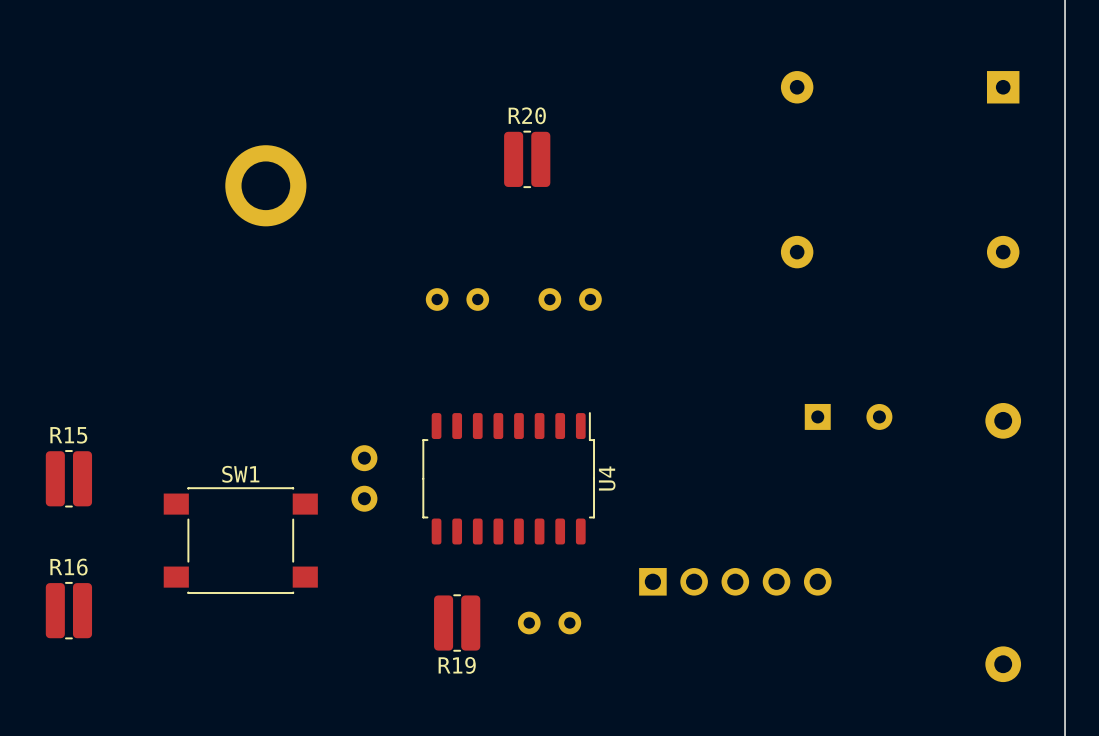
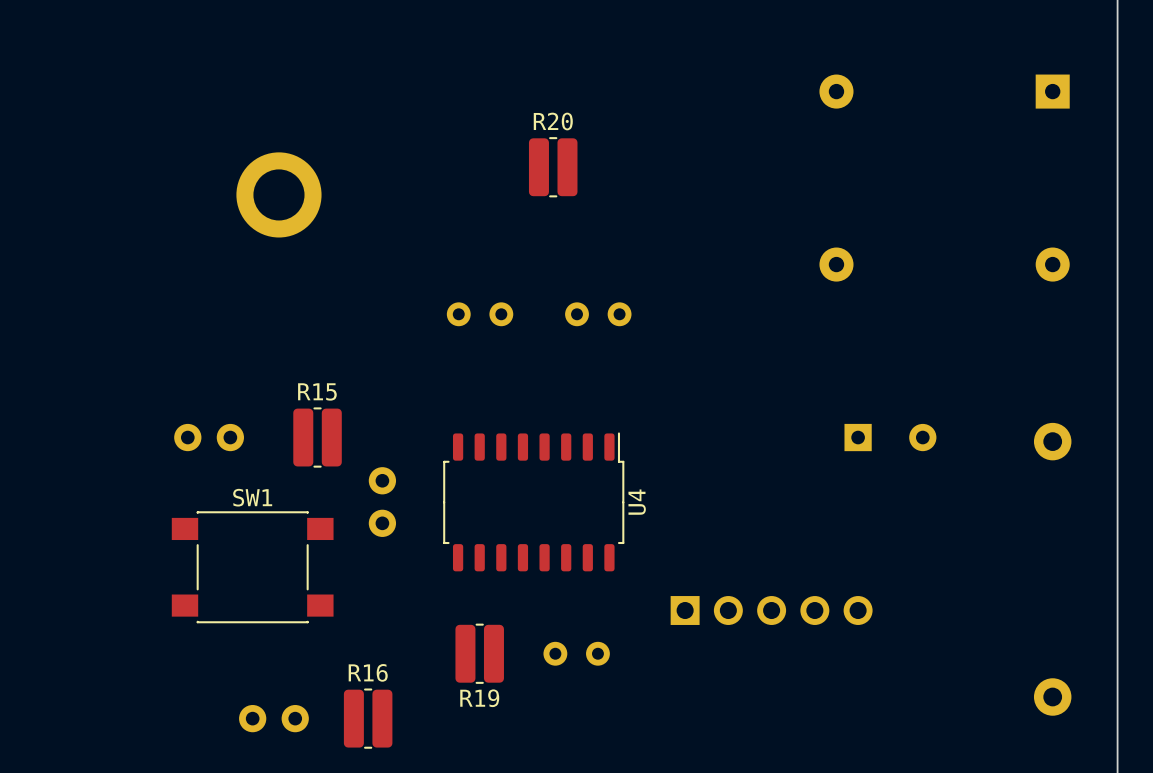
part: none -> (209, 437)
R15 position: (68, 478) -> (317, 437)
R16 position: (68, 610) -> (368, 718)
part: none -> (273, 718)

